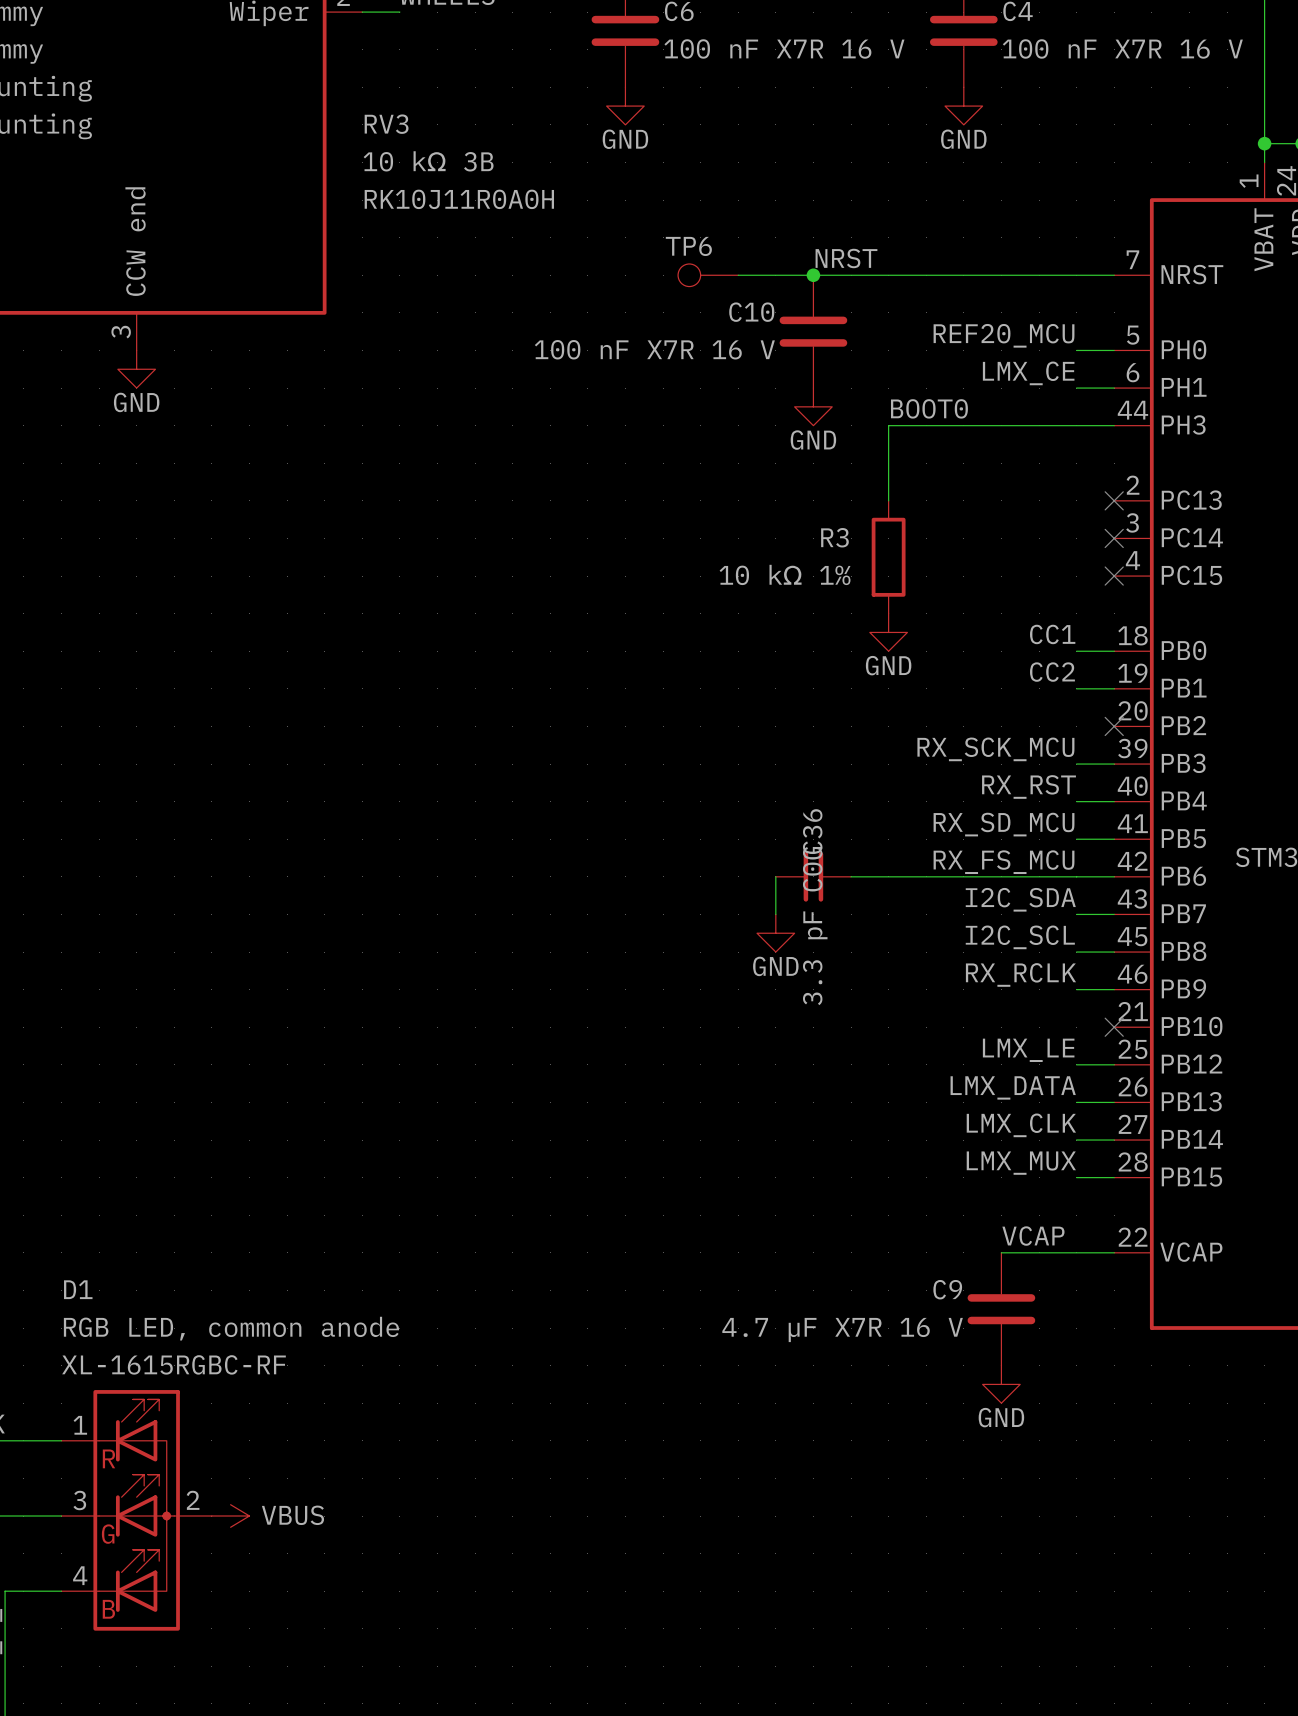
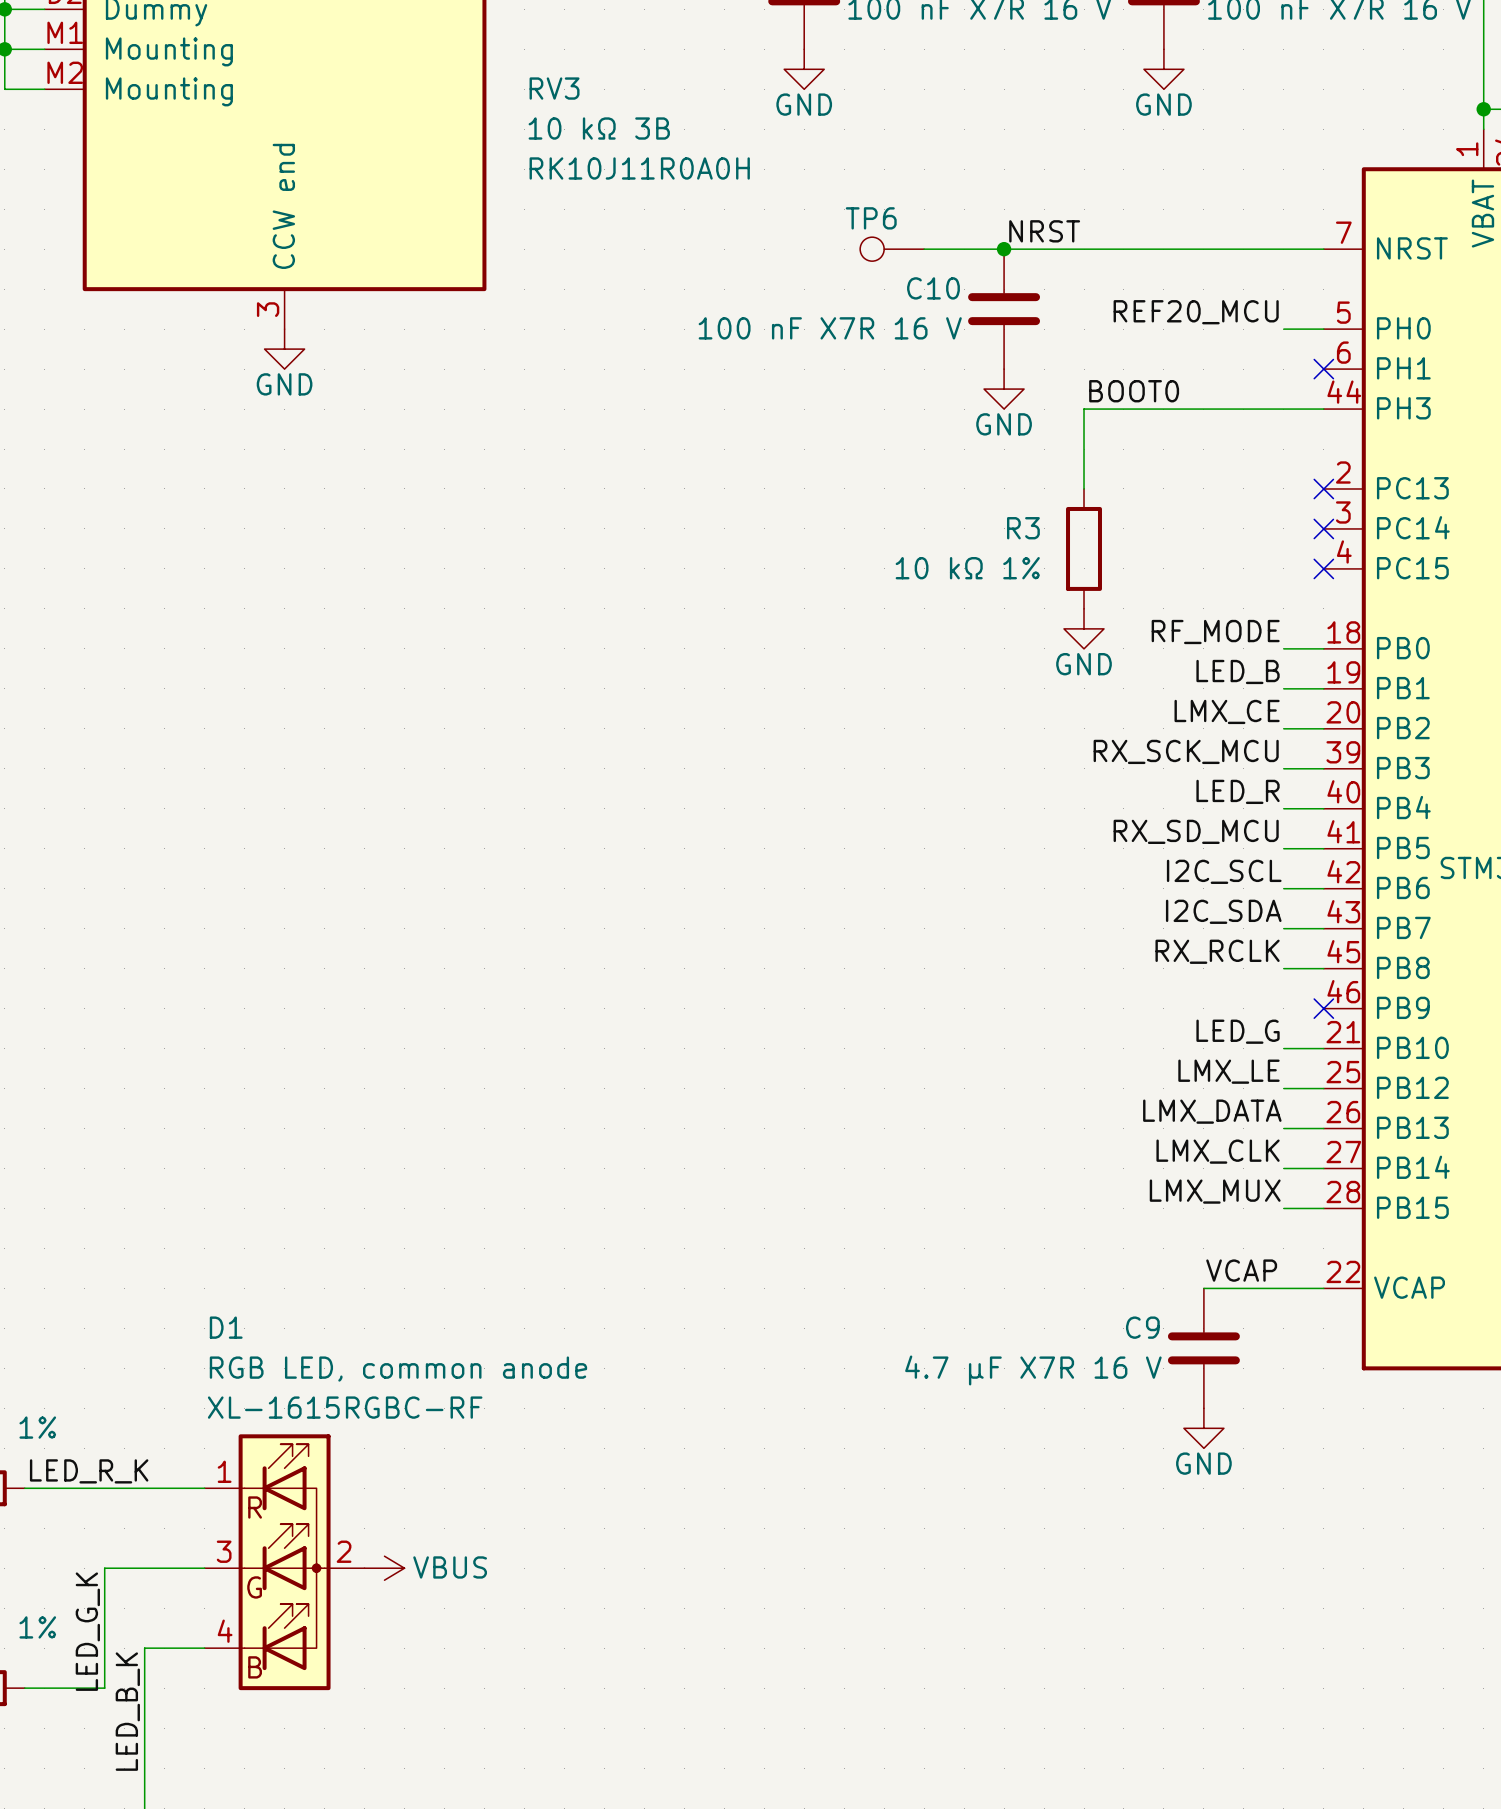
label position: LMX_CE (1028, 373) -> LMX_CE (1227, 711)
wire: (1076, 388) (1114, 388) -> (1283, 728) (1323, 728)
no-connect mark: none -> (1323, 369)
label: CC1 (1052, 634) -> RF_MODE (1215, 632)
label: CC2 (1052, 672) -> LED_B (1238, 671)
no-connect mark: (1114, 726) -> none
label: RX_RST (1029, 786) -> LED_R (1238, 791)
label: RX_FS_MCU (1004, 862) -> I2C_SCL (1224, 871)
wire: (775, 876) (775, 914) -> none
C36: 3.3 pF C0G (813, 876) -> none
wire: (851, 876) (1076, 876) -> none
power symbol: GND (775, 933) -> none
label: I2C_SCL (1020, 937) -> RX_RCLK (1217, 951)
label: RX_RCLK (1020, 974) -> none
wire: (1076, 989) (1114, 989) -> (1283, 1048) (1323, 1048)
label: none -> LED_G (1238, 1031)
no-connect mark position: (1114, 1027) -> (1323, 1008)

